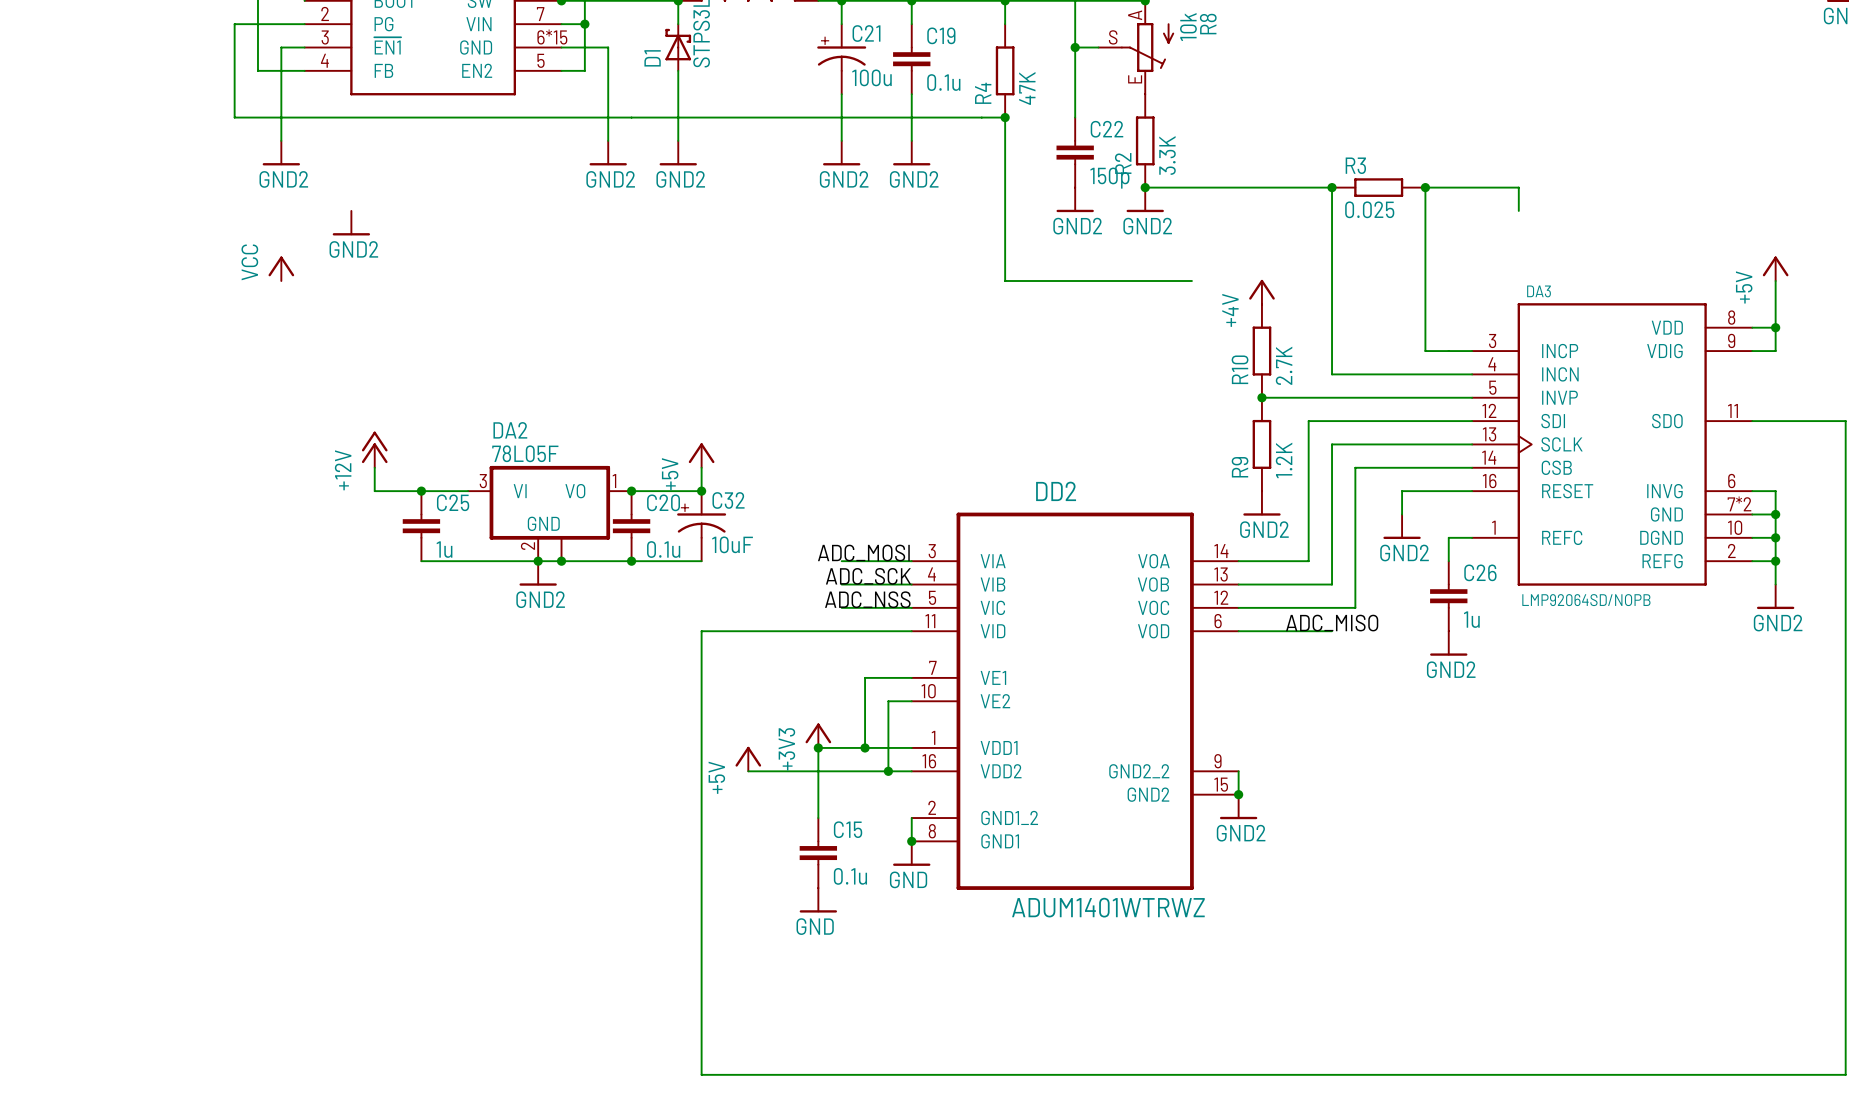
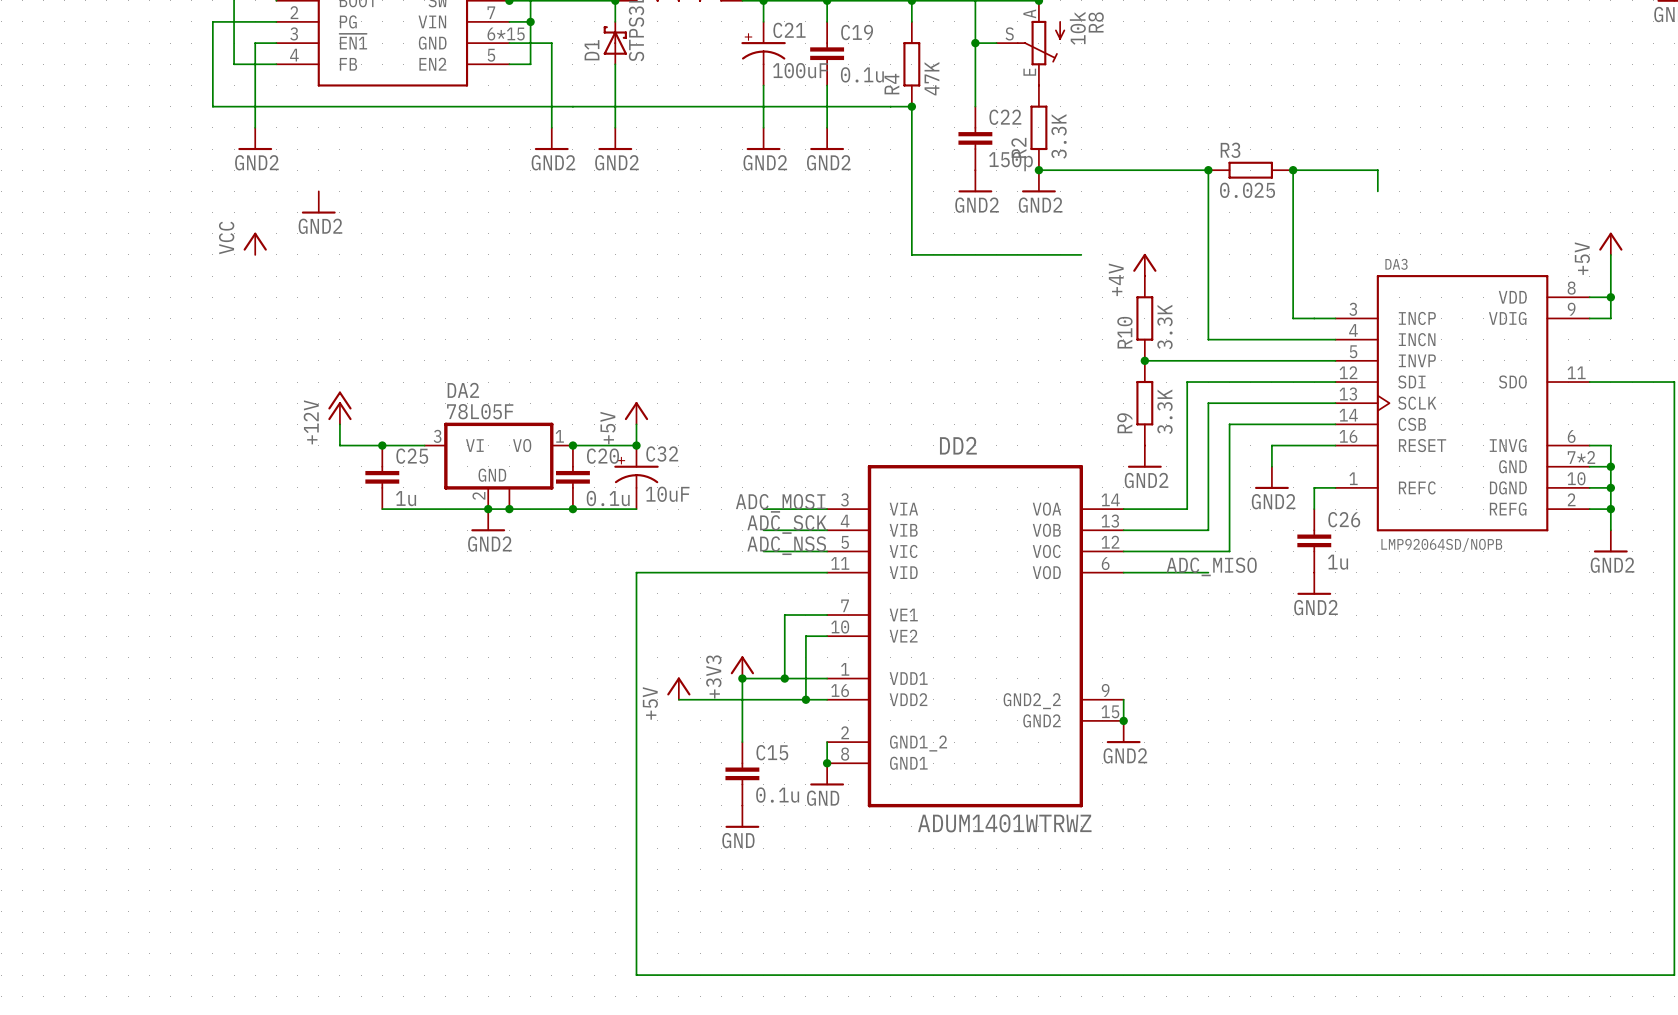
C21 value: 100u (872, 77) -> 100uF (800, 70)
R10 value: 2.7K (1284, 365) -> 3.3K (1164, 327)
R9 value: 1.2K (1284, 460) -> 3.3K (1164, 411)

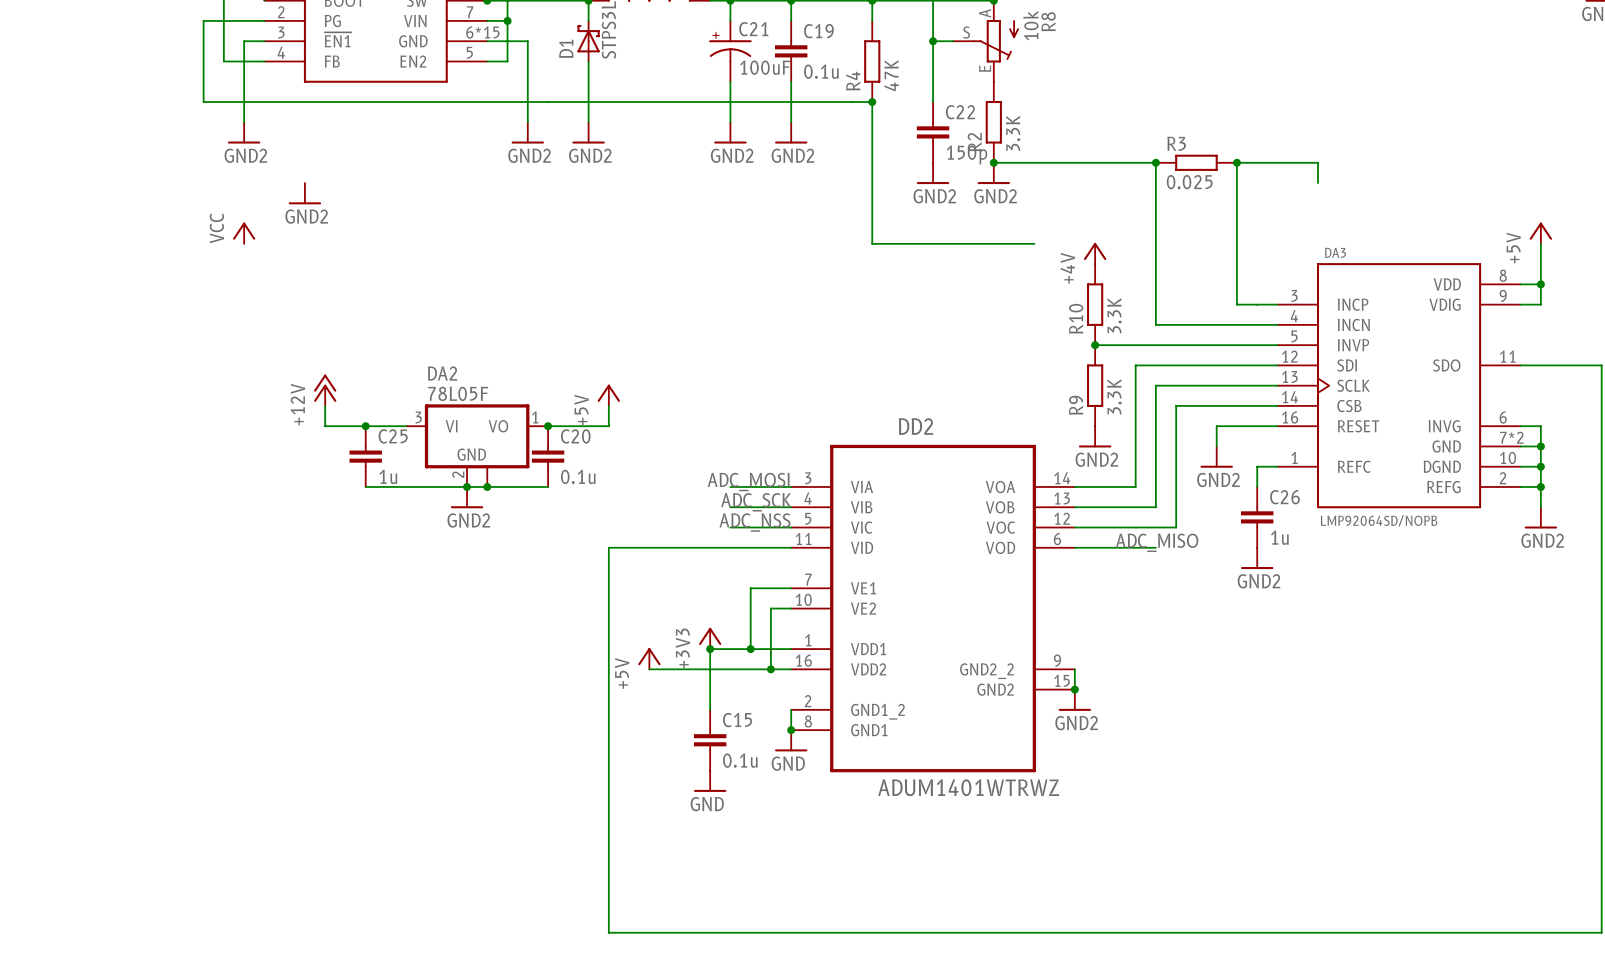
junction: (636, 445) -> none
C32: 10uF (636, 477) -> none
wire: (572, 509) (636, 509) -> none
junction: (572, 509) -> none

